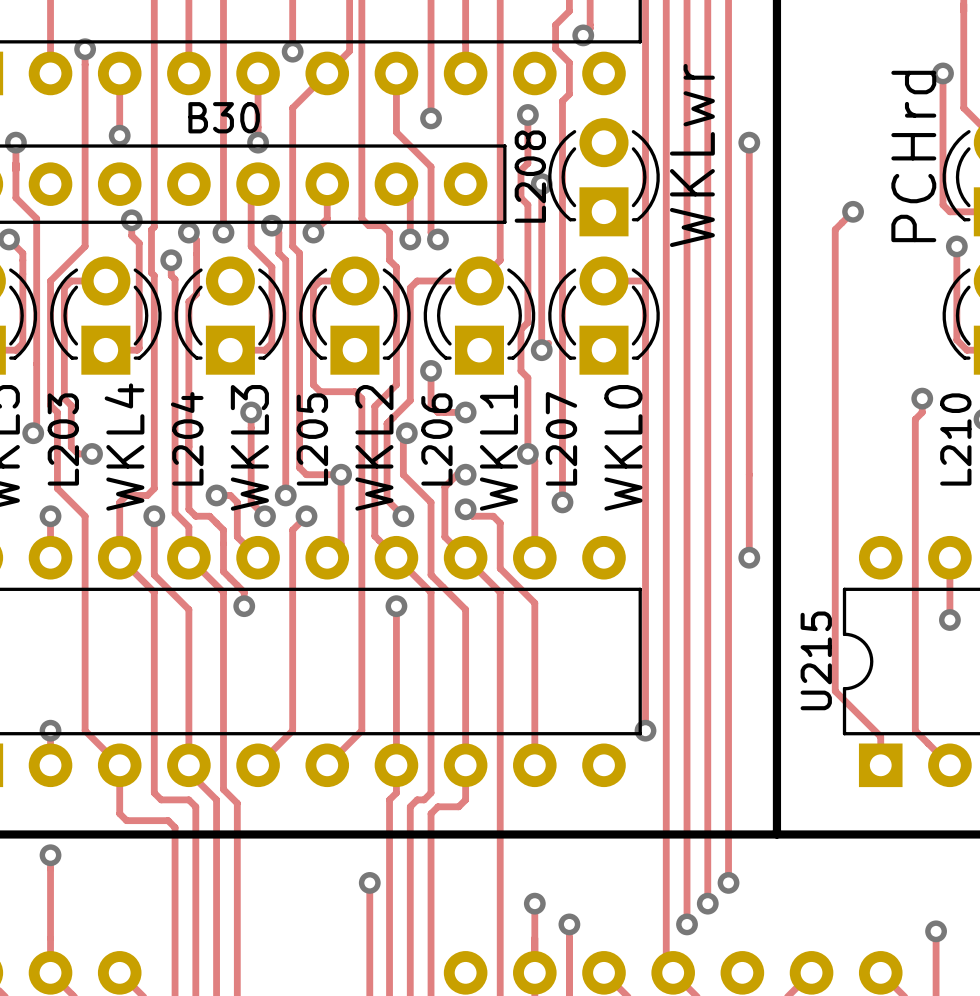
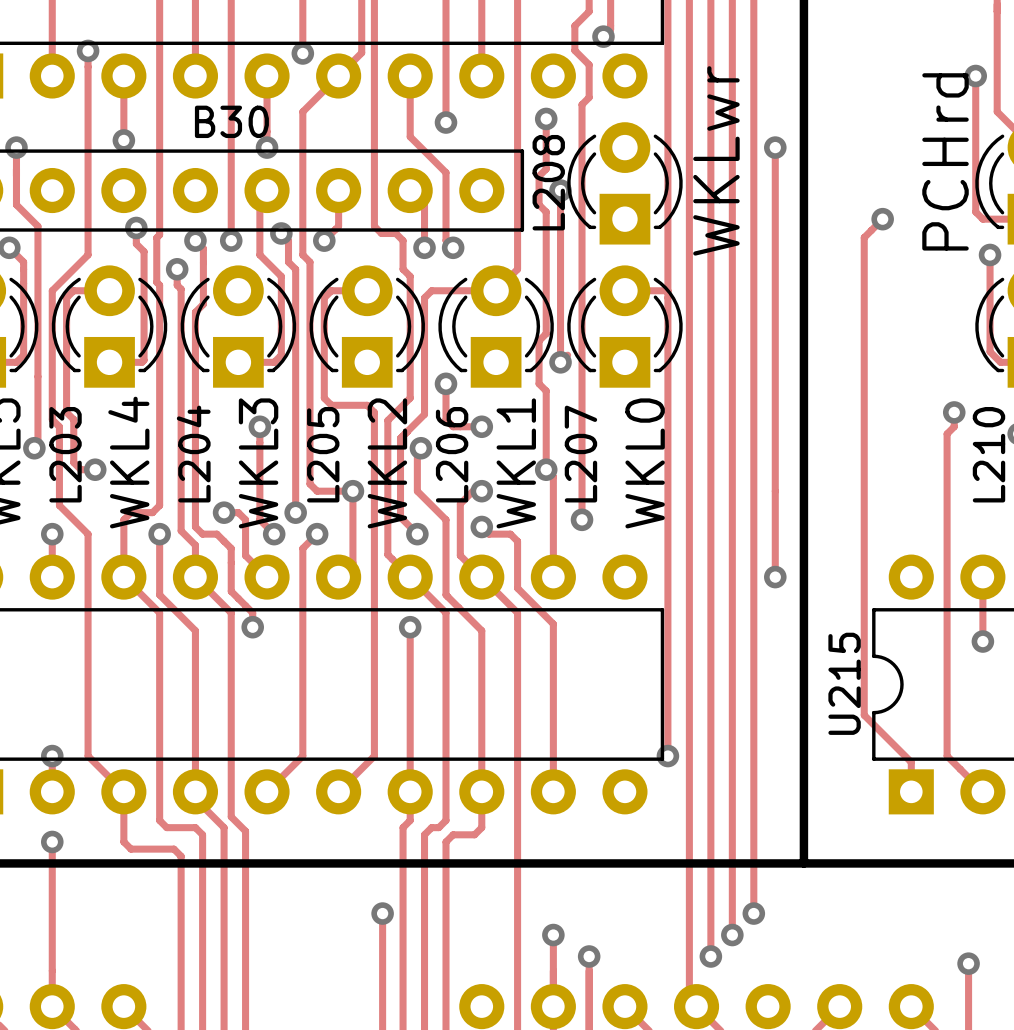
track: none -> (52, 841) (52, 884)
via position: (50, 855) -> (52, 841)

